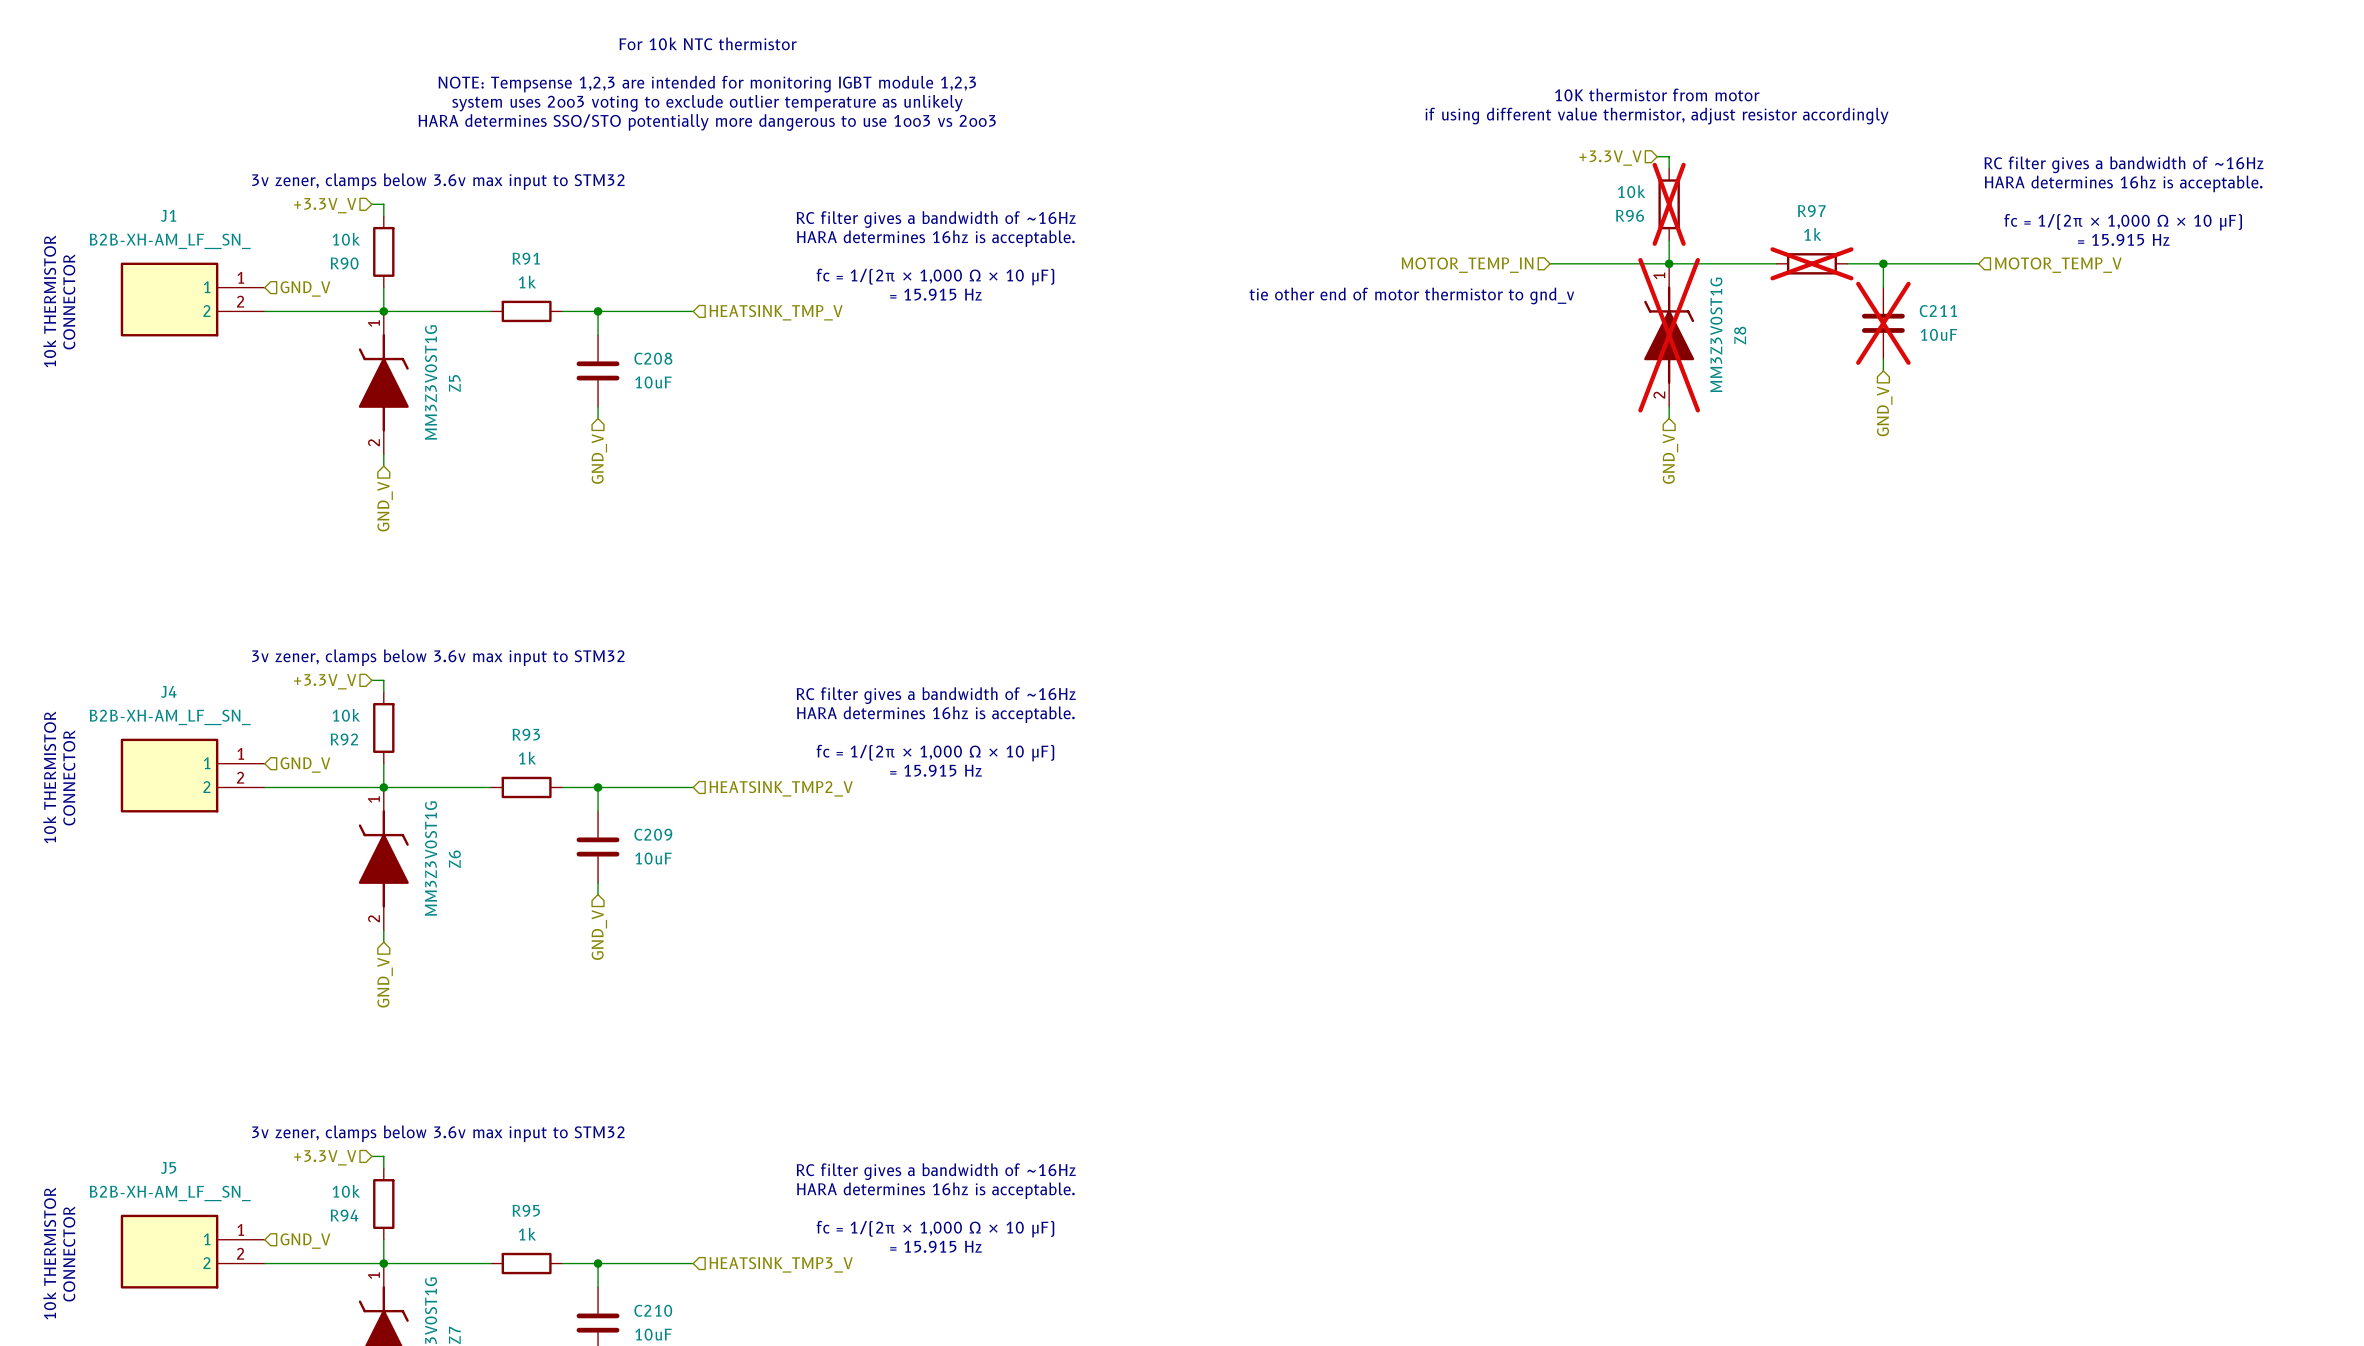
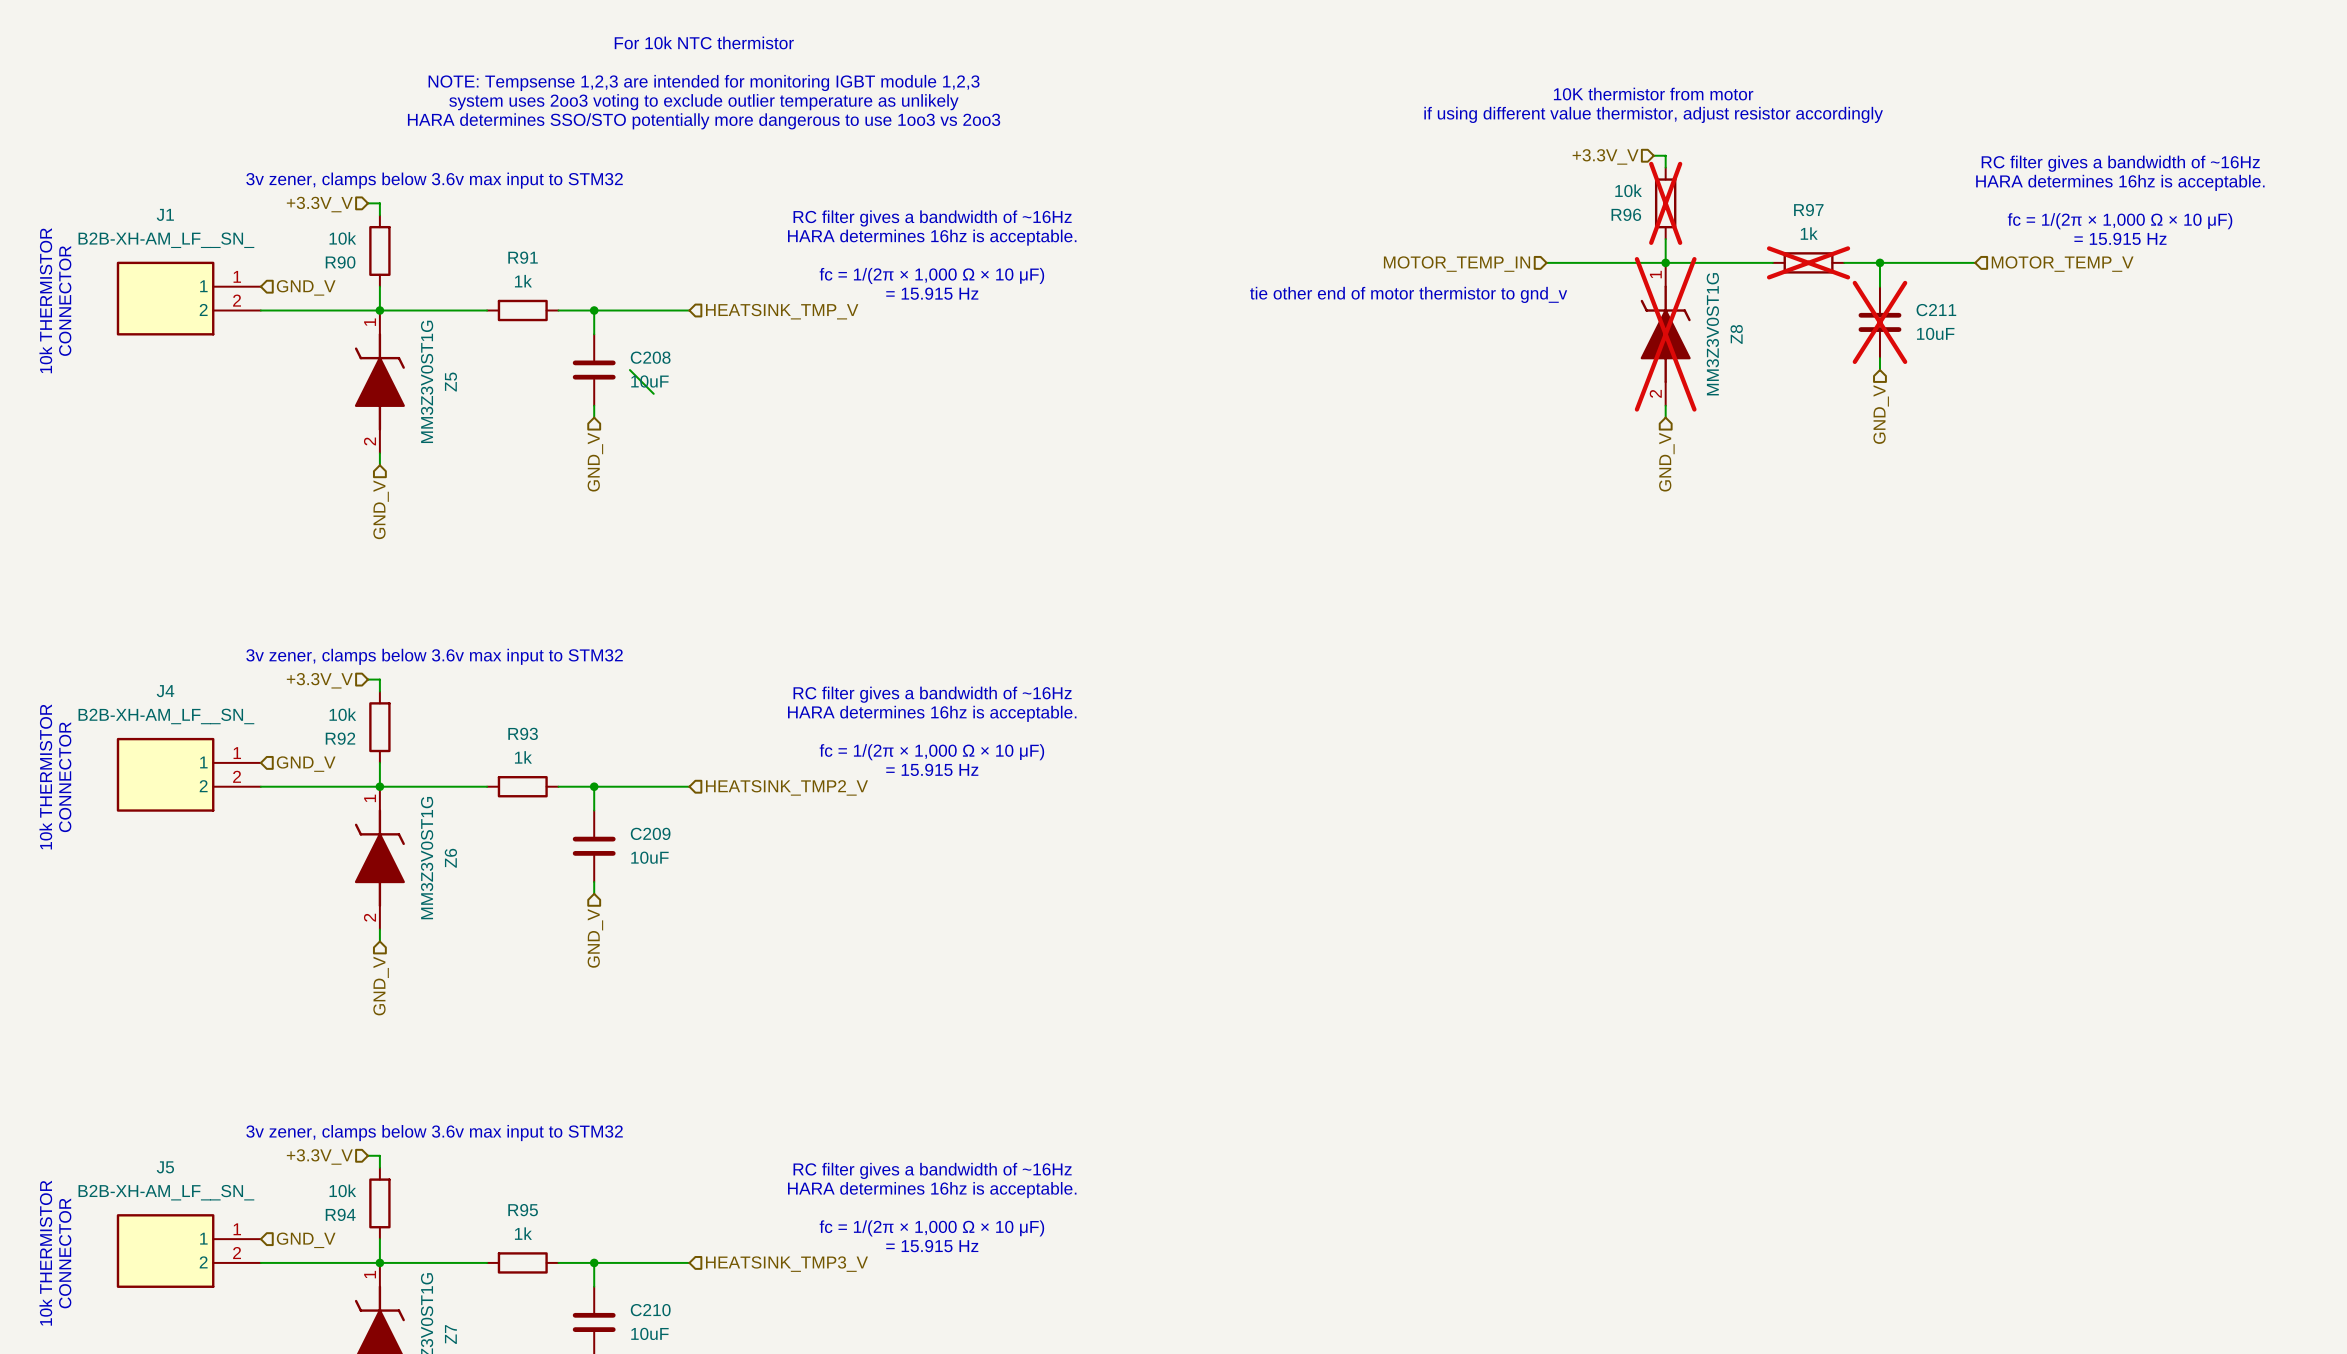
wire: none -> (629, 370) (653, 393)

